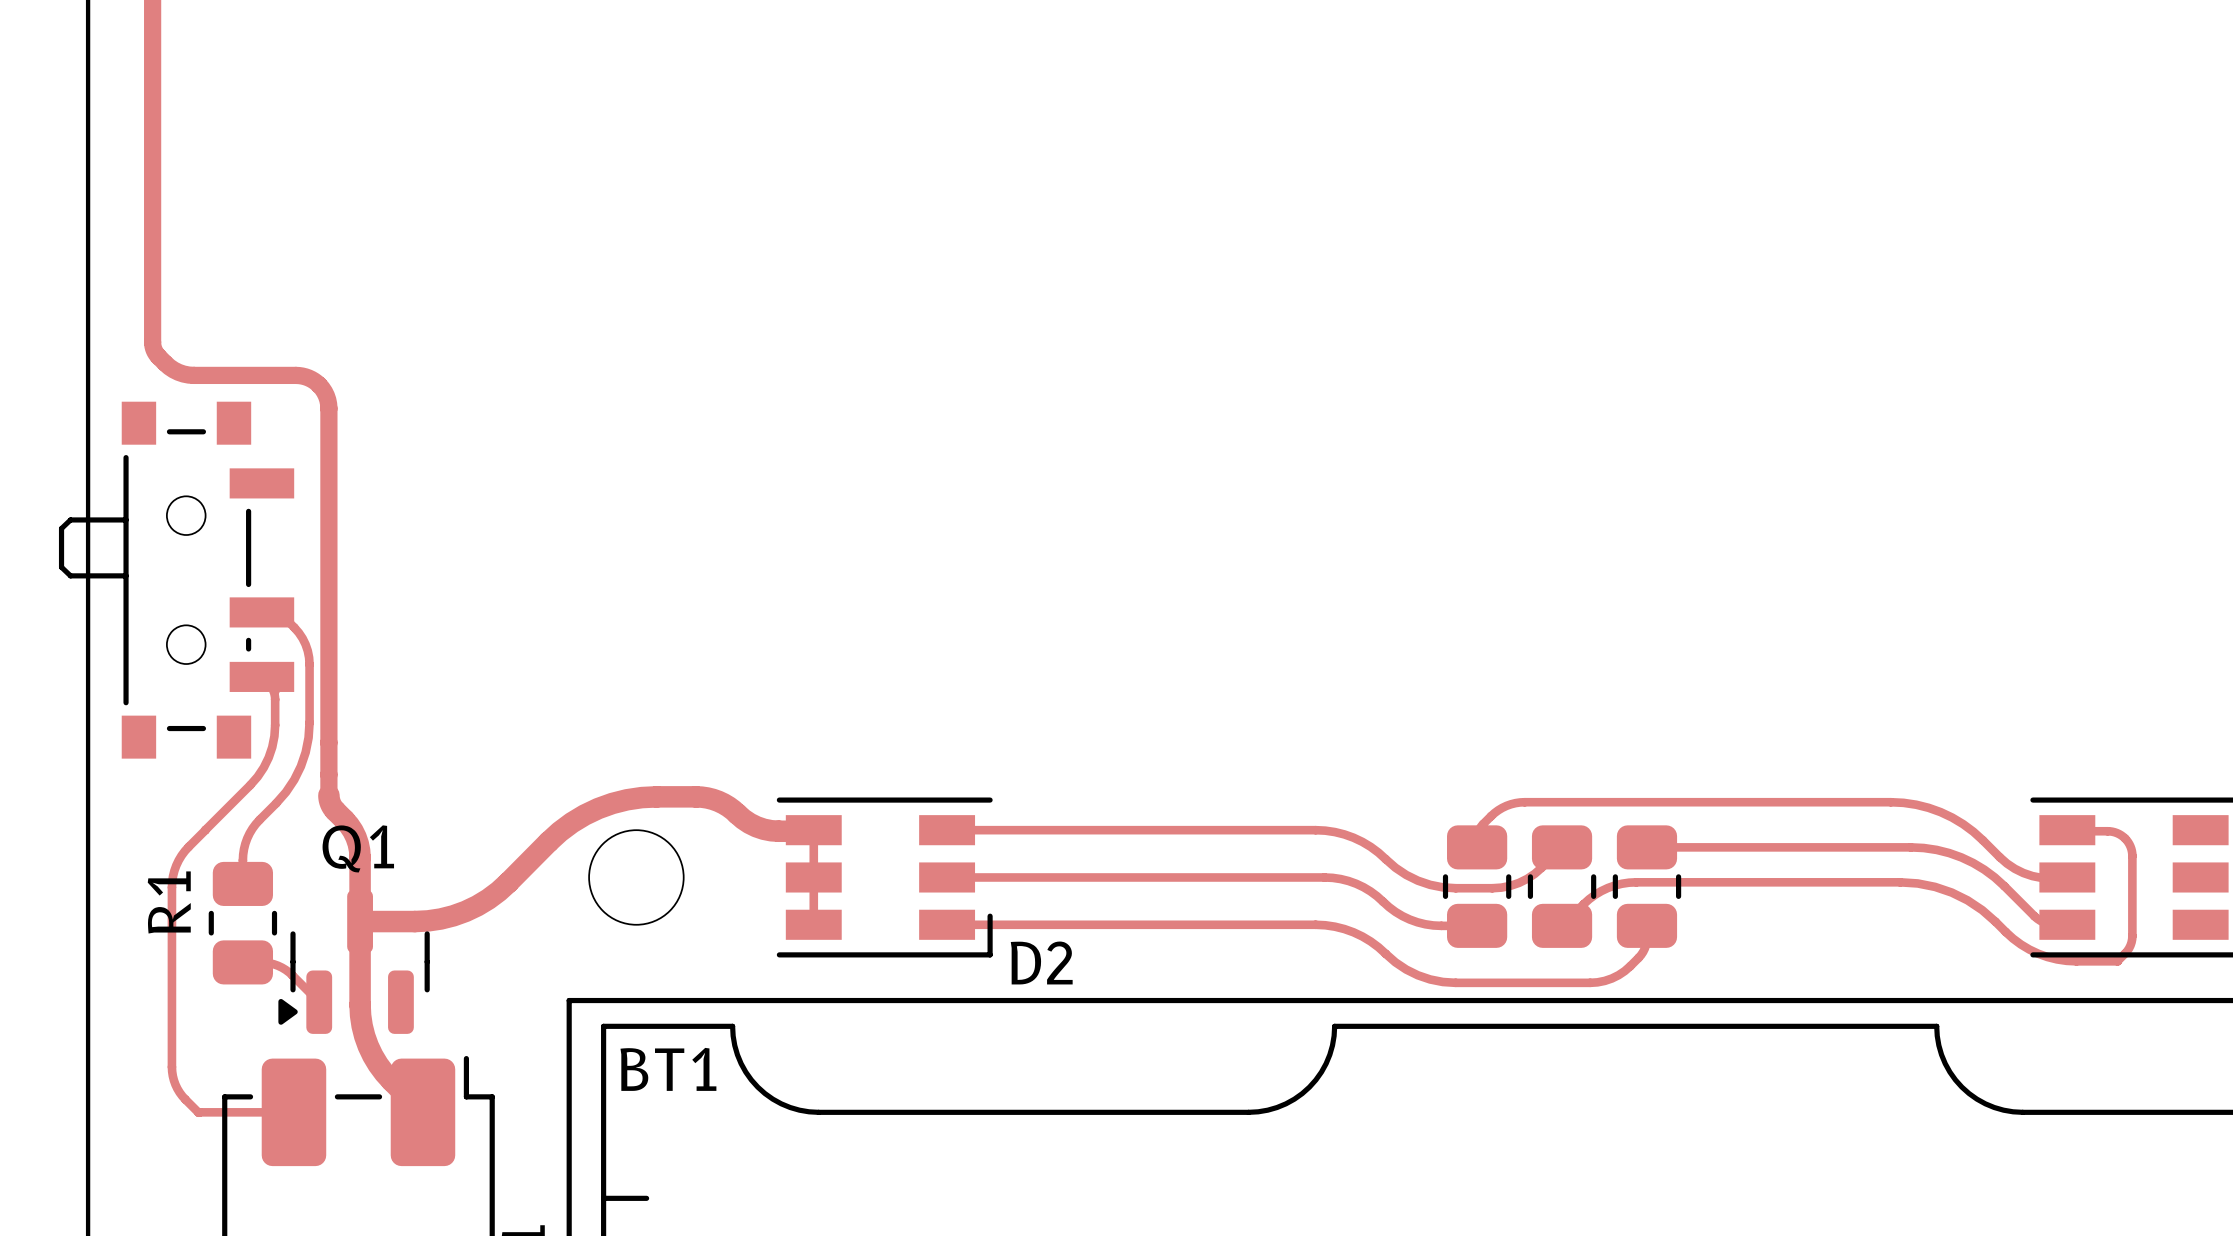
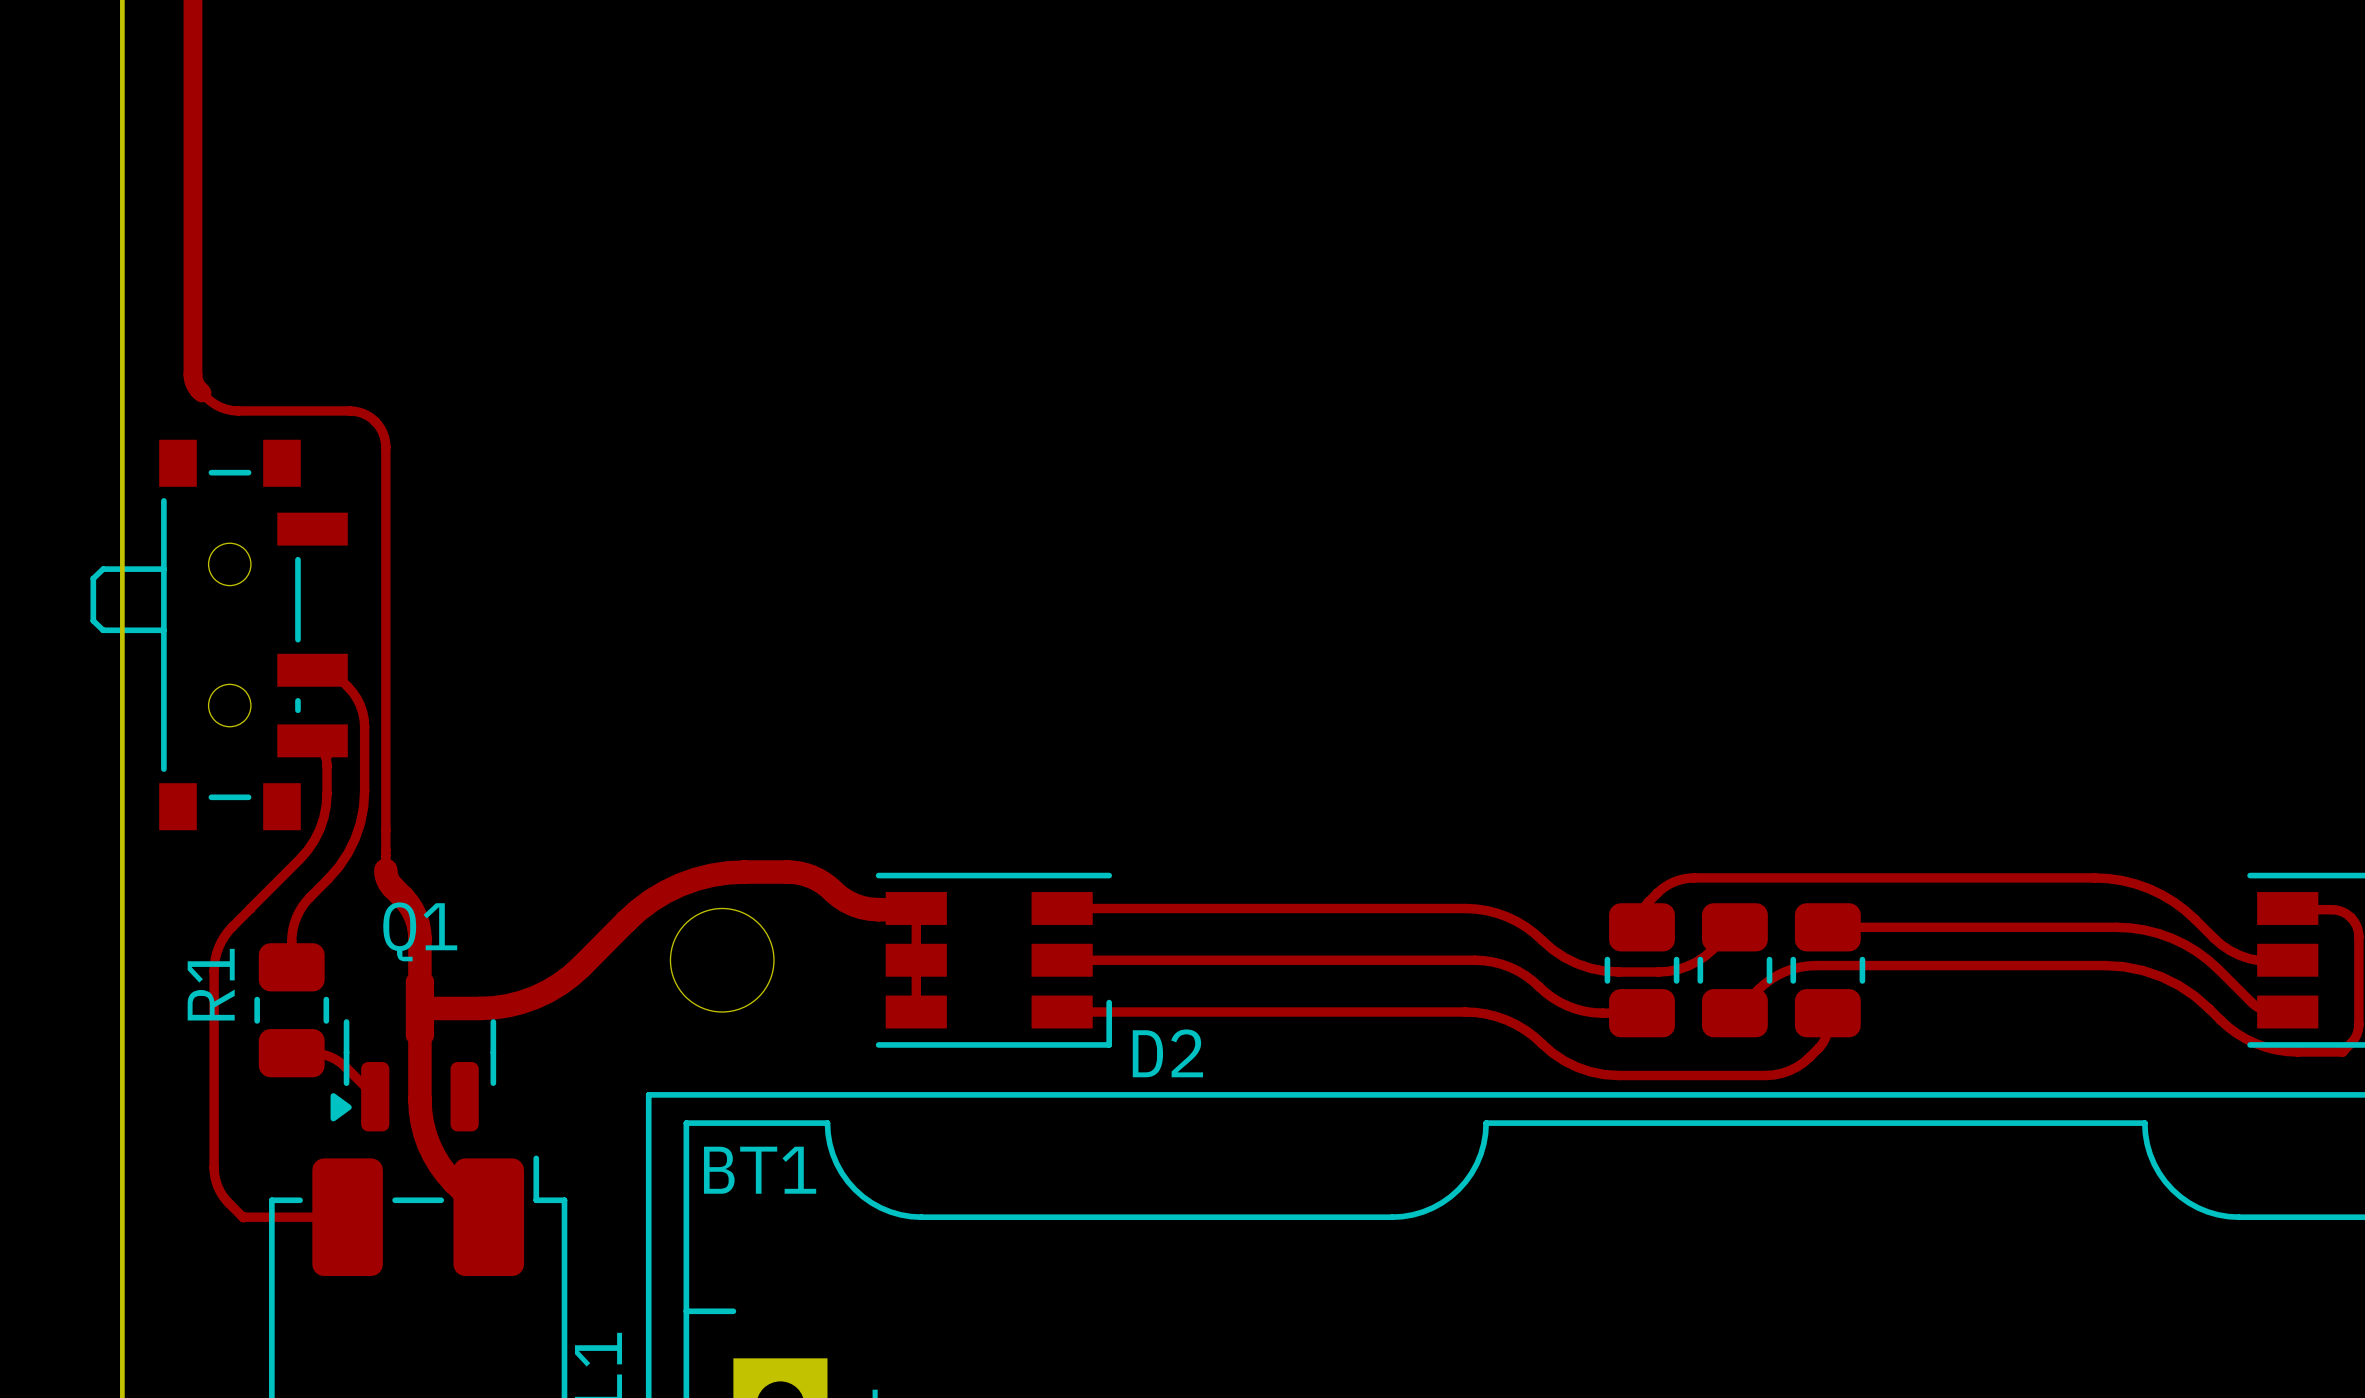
top track width: thick (165, 363) (173, 370) (188, 375) (302, 376) (316, 382) (326, 395) (328, 408) (328, 790) -> thin (207, 398) (216, 405) (232, 410) (356, 411) (372, 419) (383, 433) (385, 447) (385, 865)

